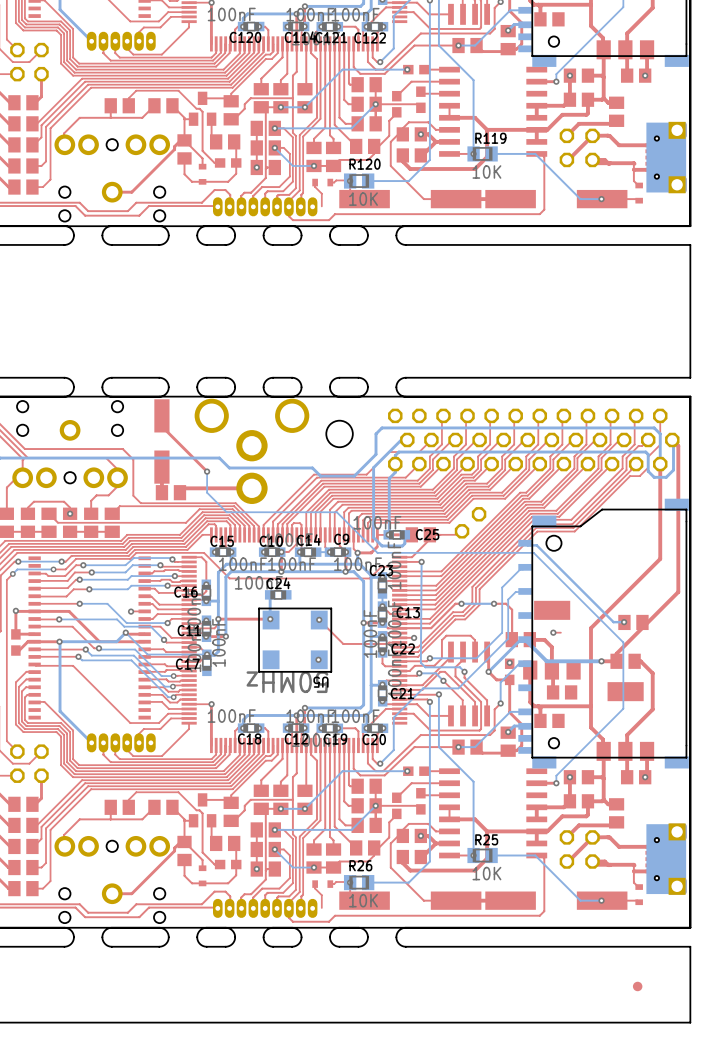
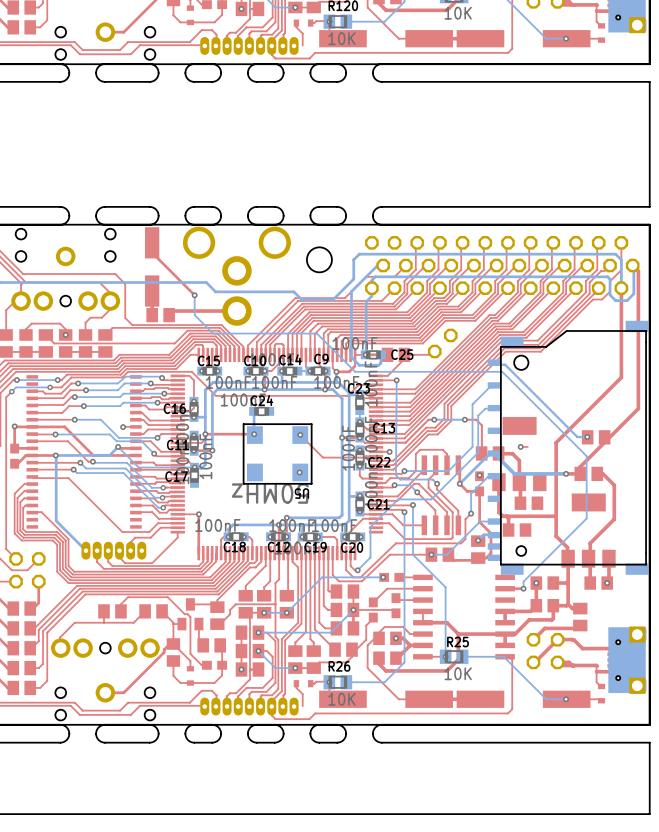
part: (637, 986) -> none

